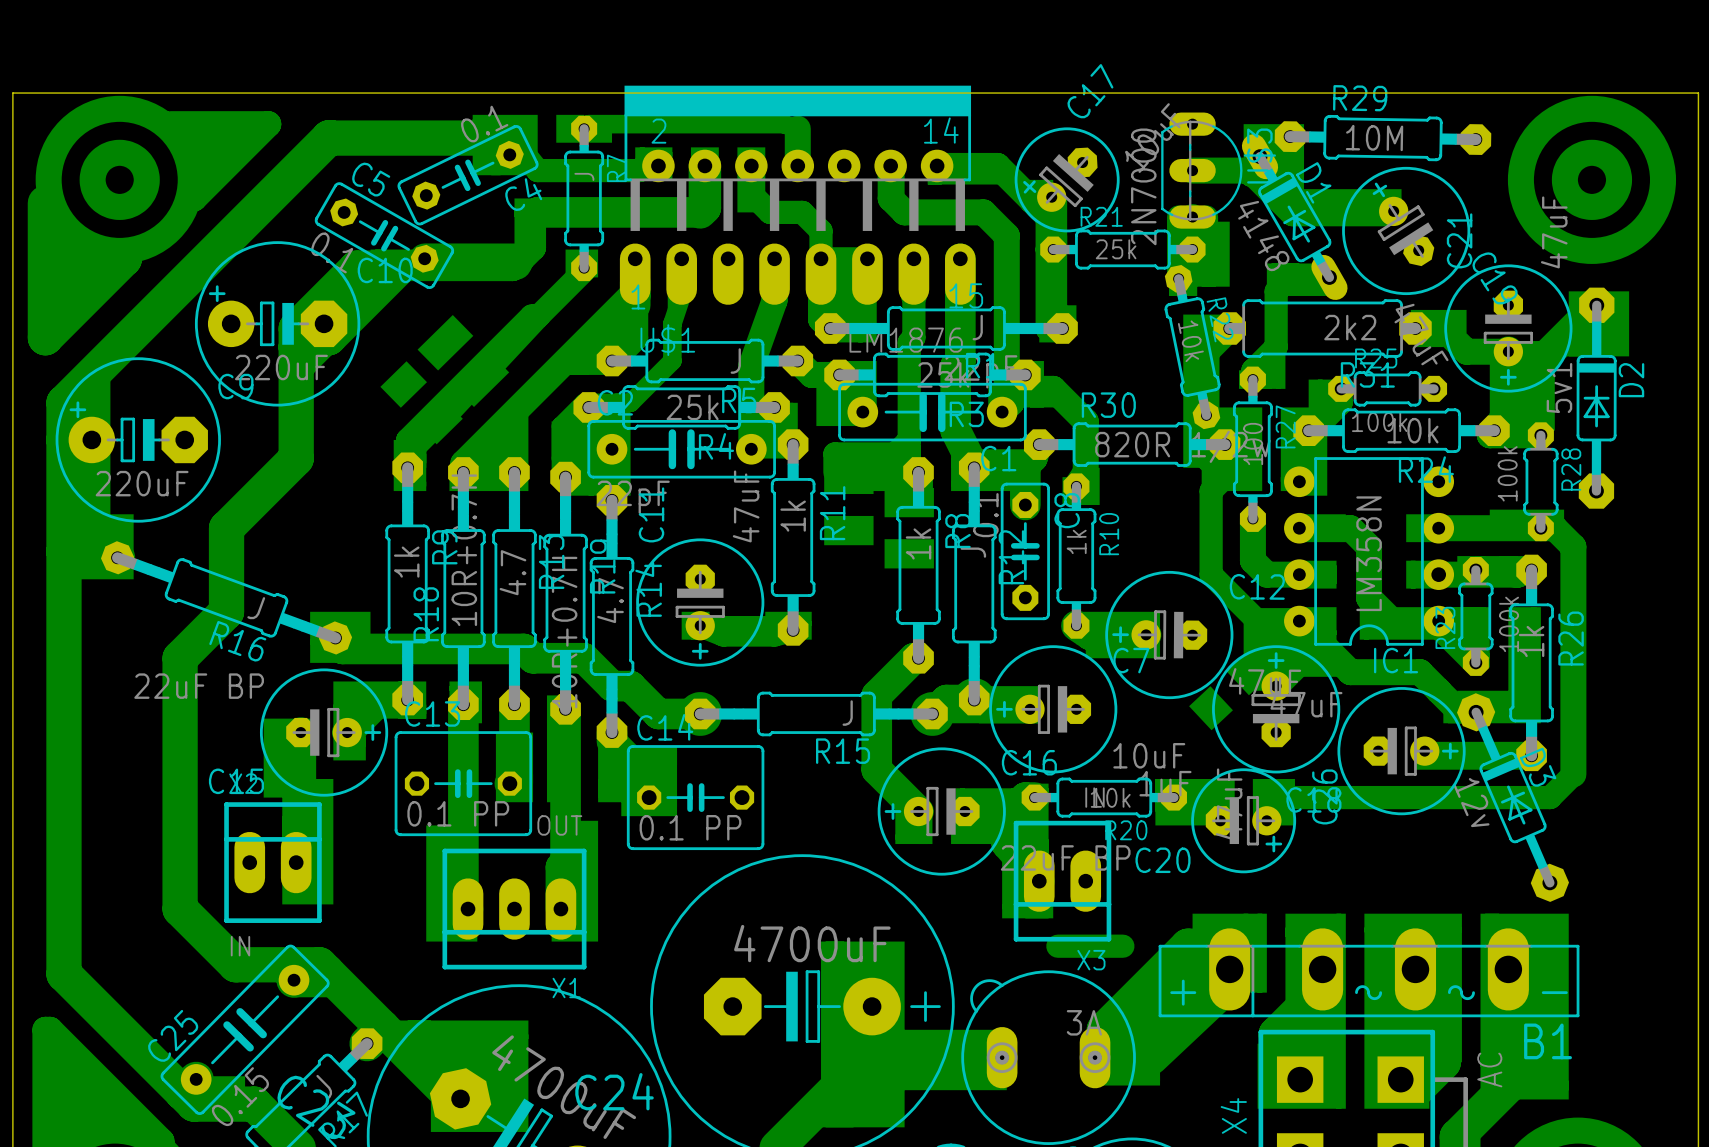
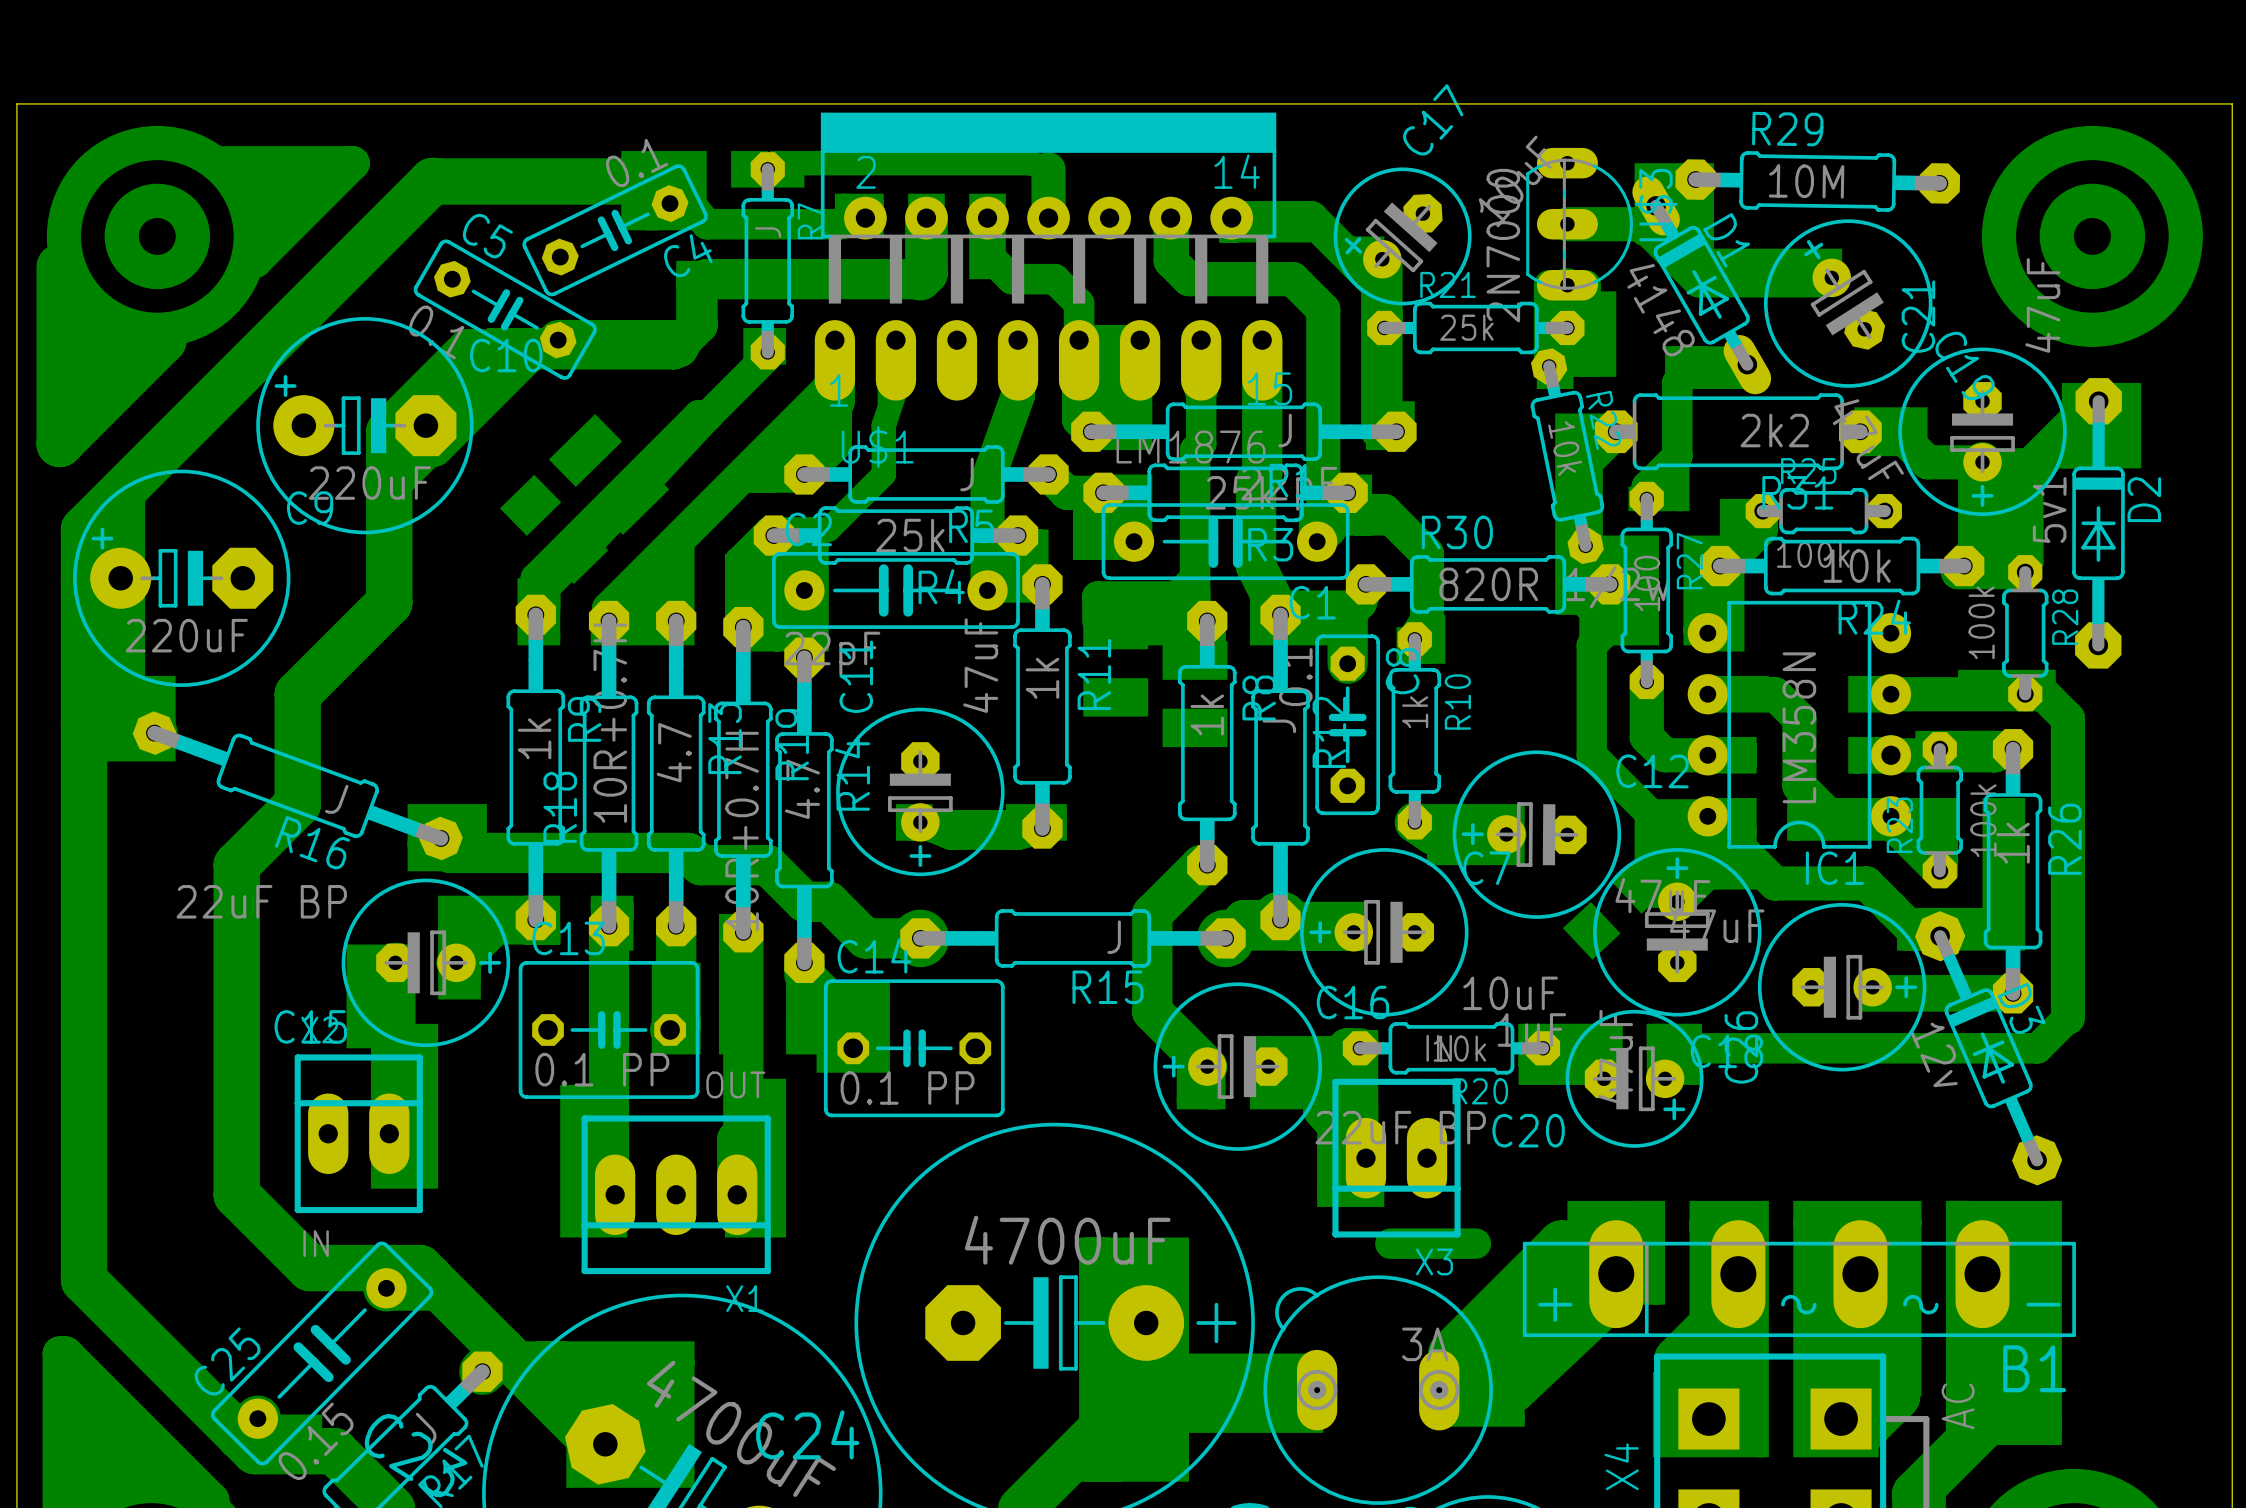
board edge: (12, 93) (1698, 93) -> (16, 122) (16, 103) (2232, 103) (2232, 122)

